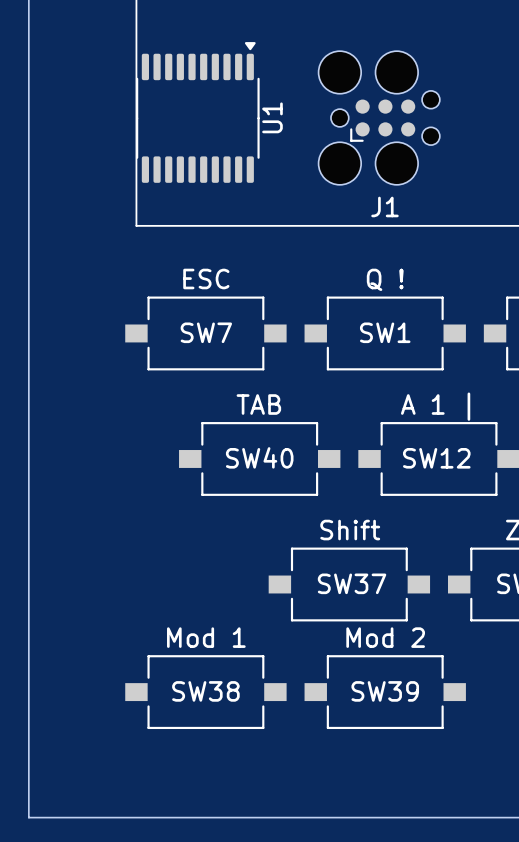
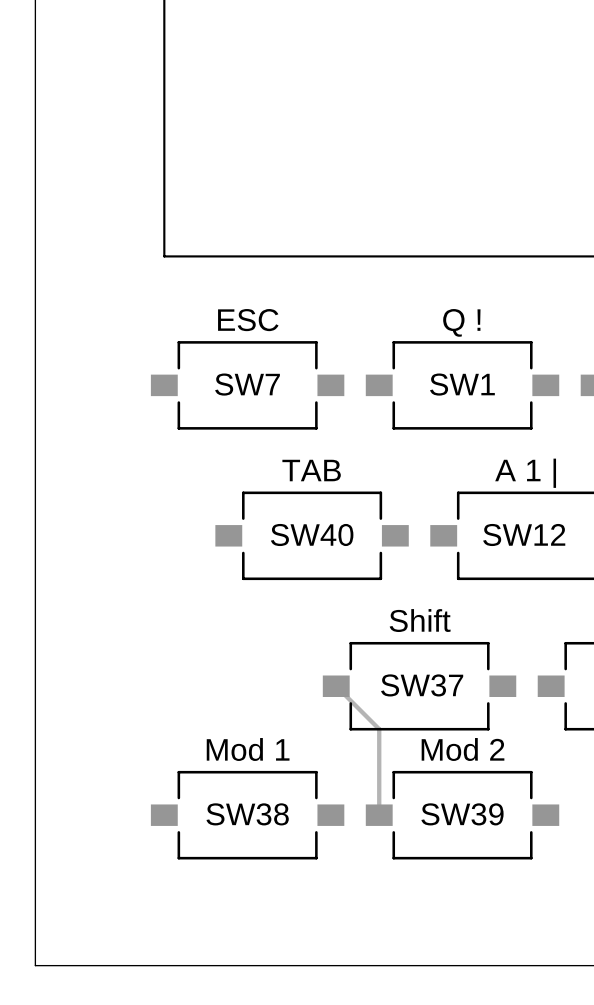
U1: (197, 112) -> none
J1: (379, 118) -> none
track: none -> (336, 686) (379, 729) (379, 815)

